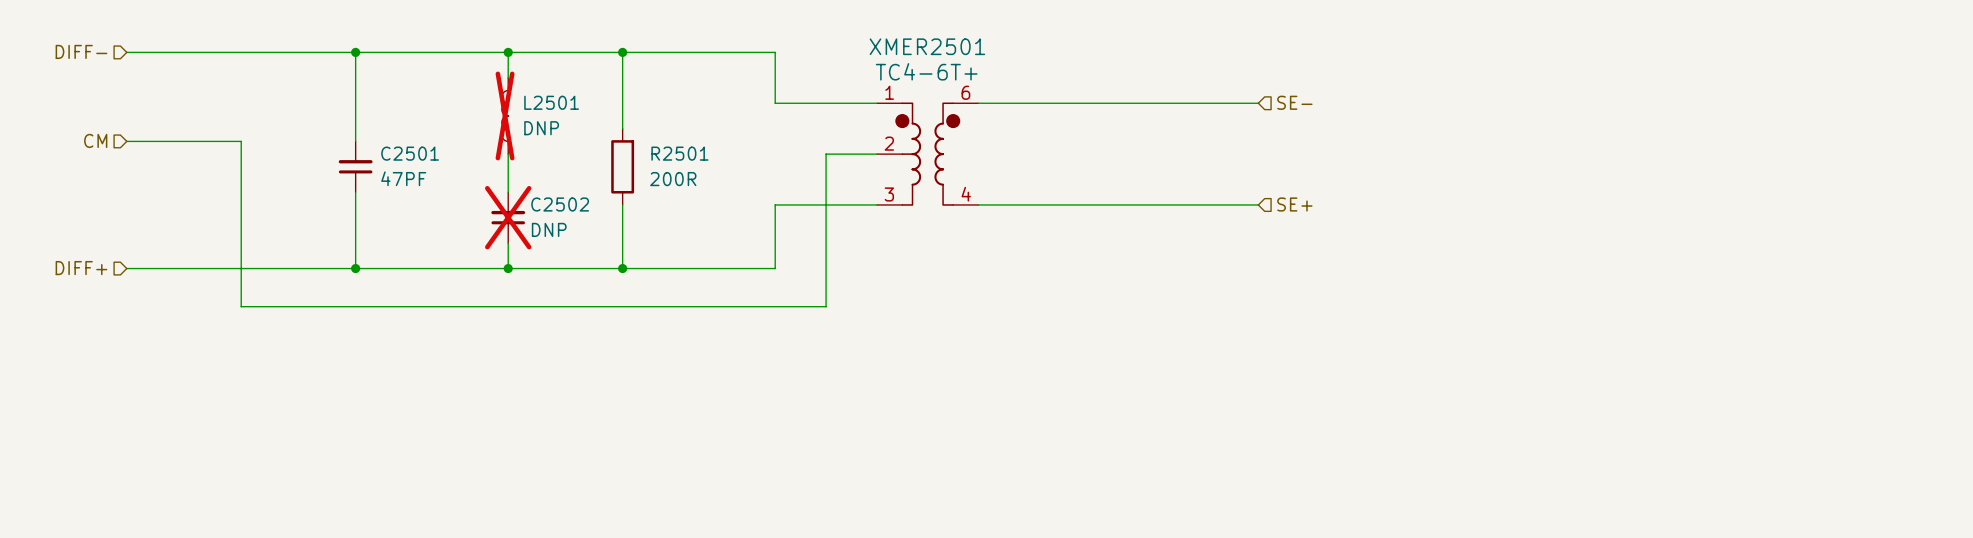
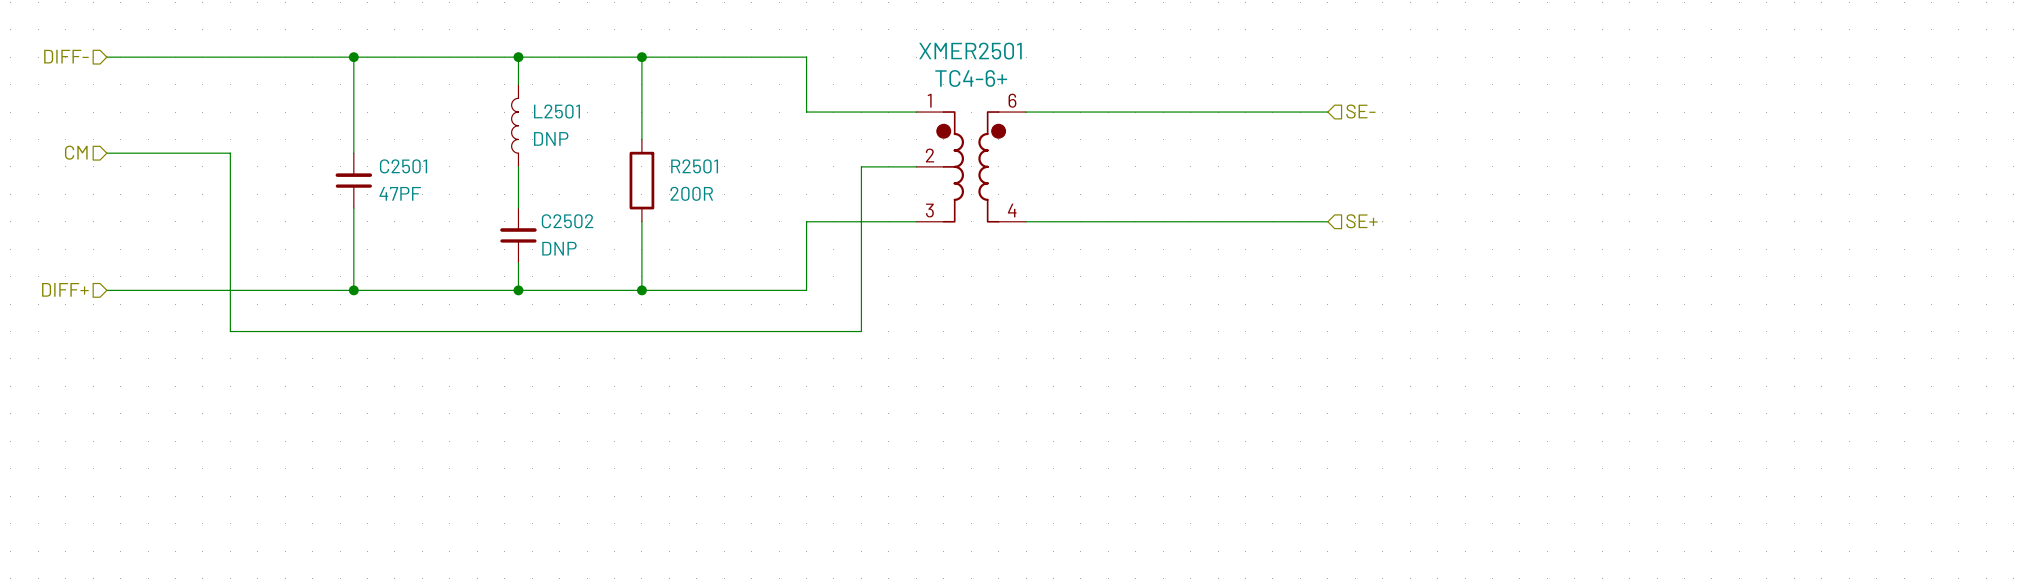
XMER2501 value: TC4-6T+ (926, 71) -> TC4-6+ (971, 78)
L2501 do-not-place cross: (505, 115) -> none
C2502 do-not-place cross: (508, 217) -> none

